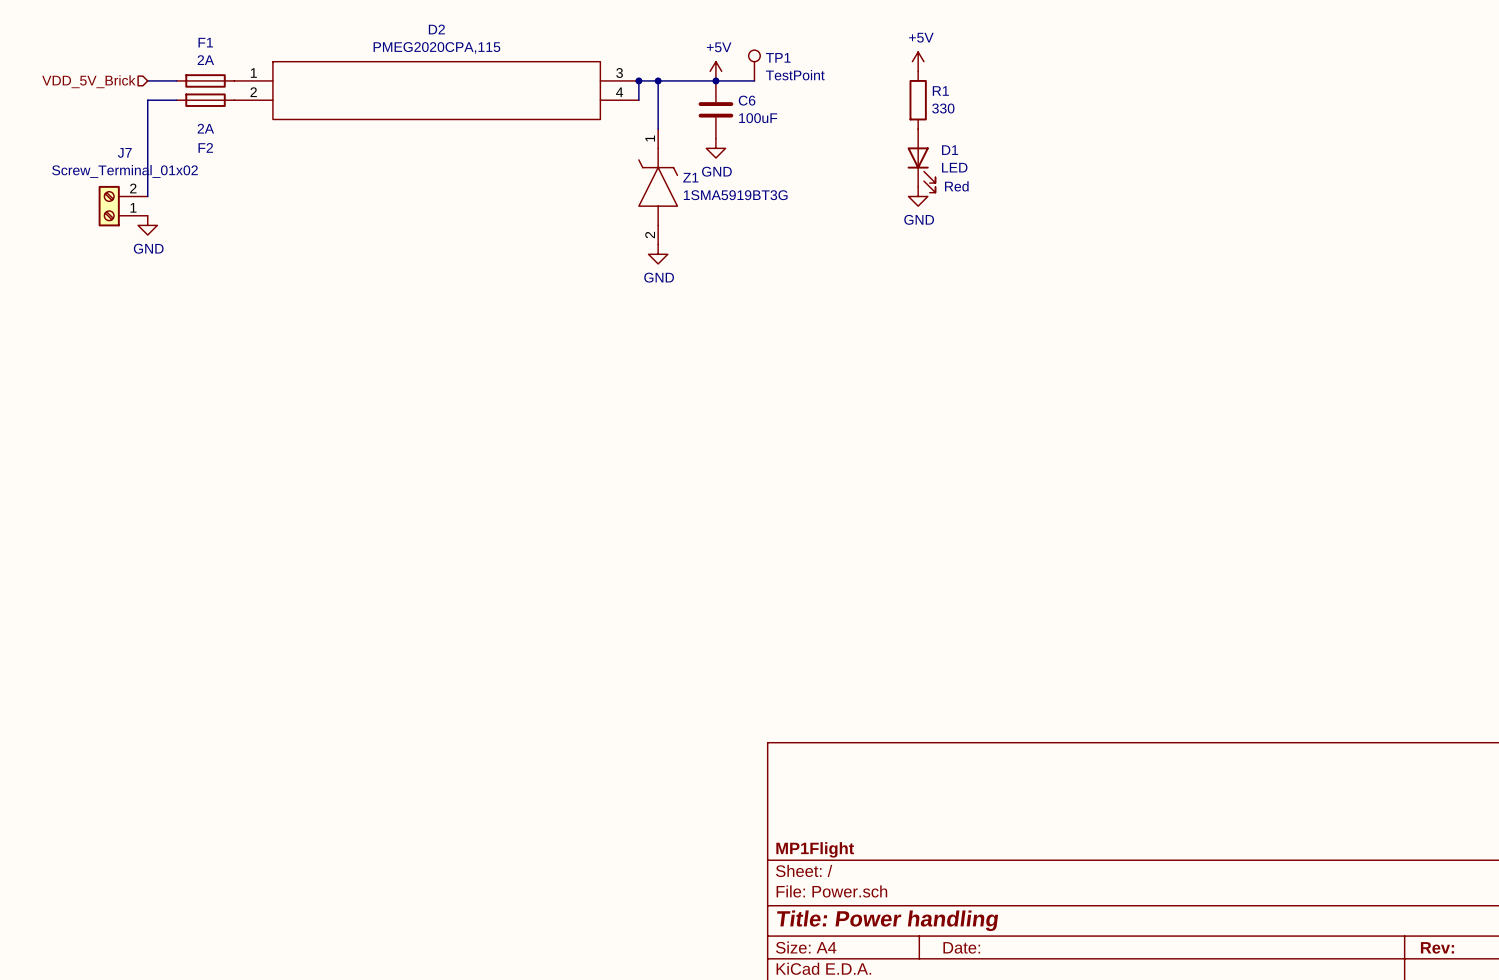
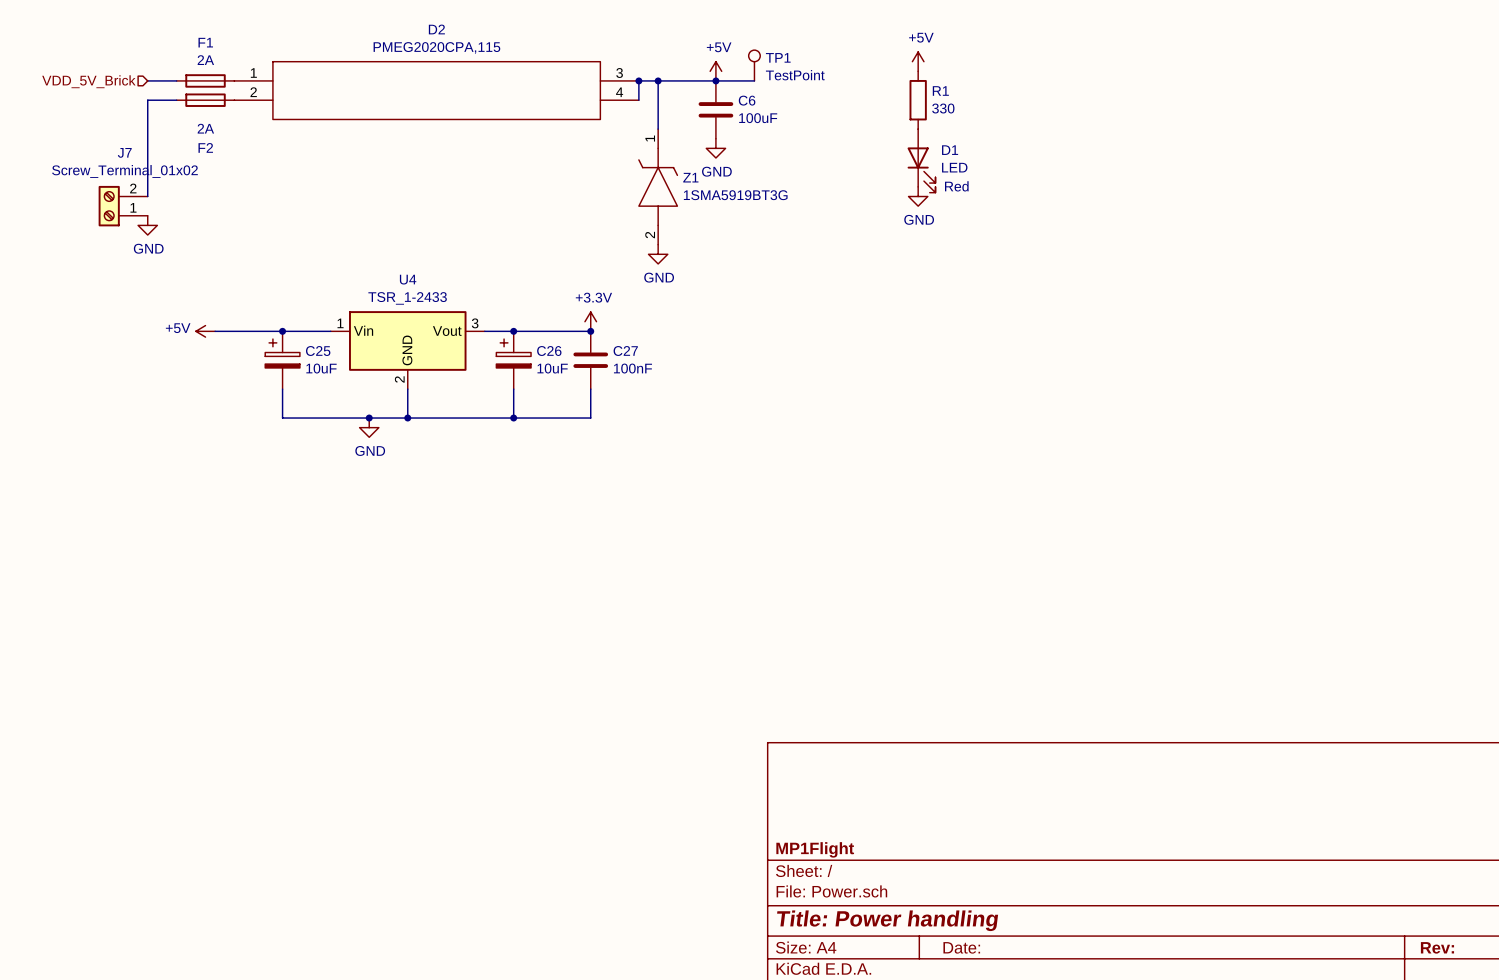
power symbol: none -> +3.3V (590, 321)
power symbol: none -> +5V (205, 331)
wire: none -> (215, 331) (330, 331)
junction: none -> (282, 331)
wire: none -> (484, 331) (590, 331)
junction: none -> (513, 331)
junction: none -> (590, 331)
U4: none -> TSR_1-2433 (407, 350)
C25: none -> 10uF (282, 360)
C26: none -> 10uF (513, 360)
C27: none -> 100nF (590, 360)
wire: none -> (282, 389) (282, 418) (590, 418) (590, 389)
wire: none -> (407, 389) (407, 418)
wire: none -> (513, 389) (513, 418)
junction: none -> (369, 418)
junction: none -> (407, 418)
junction: none -> (513, 418)
power symbol: none -> GND (369, 427)

